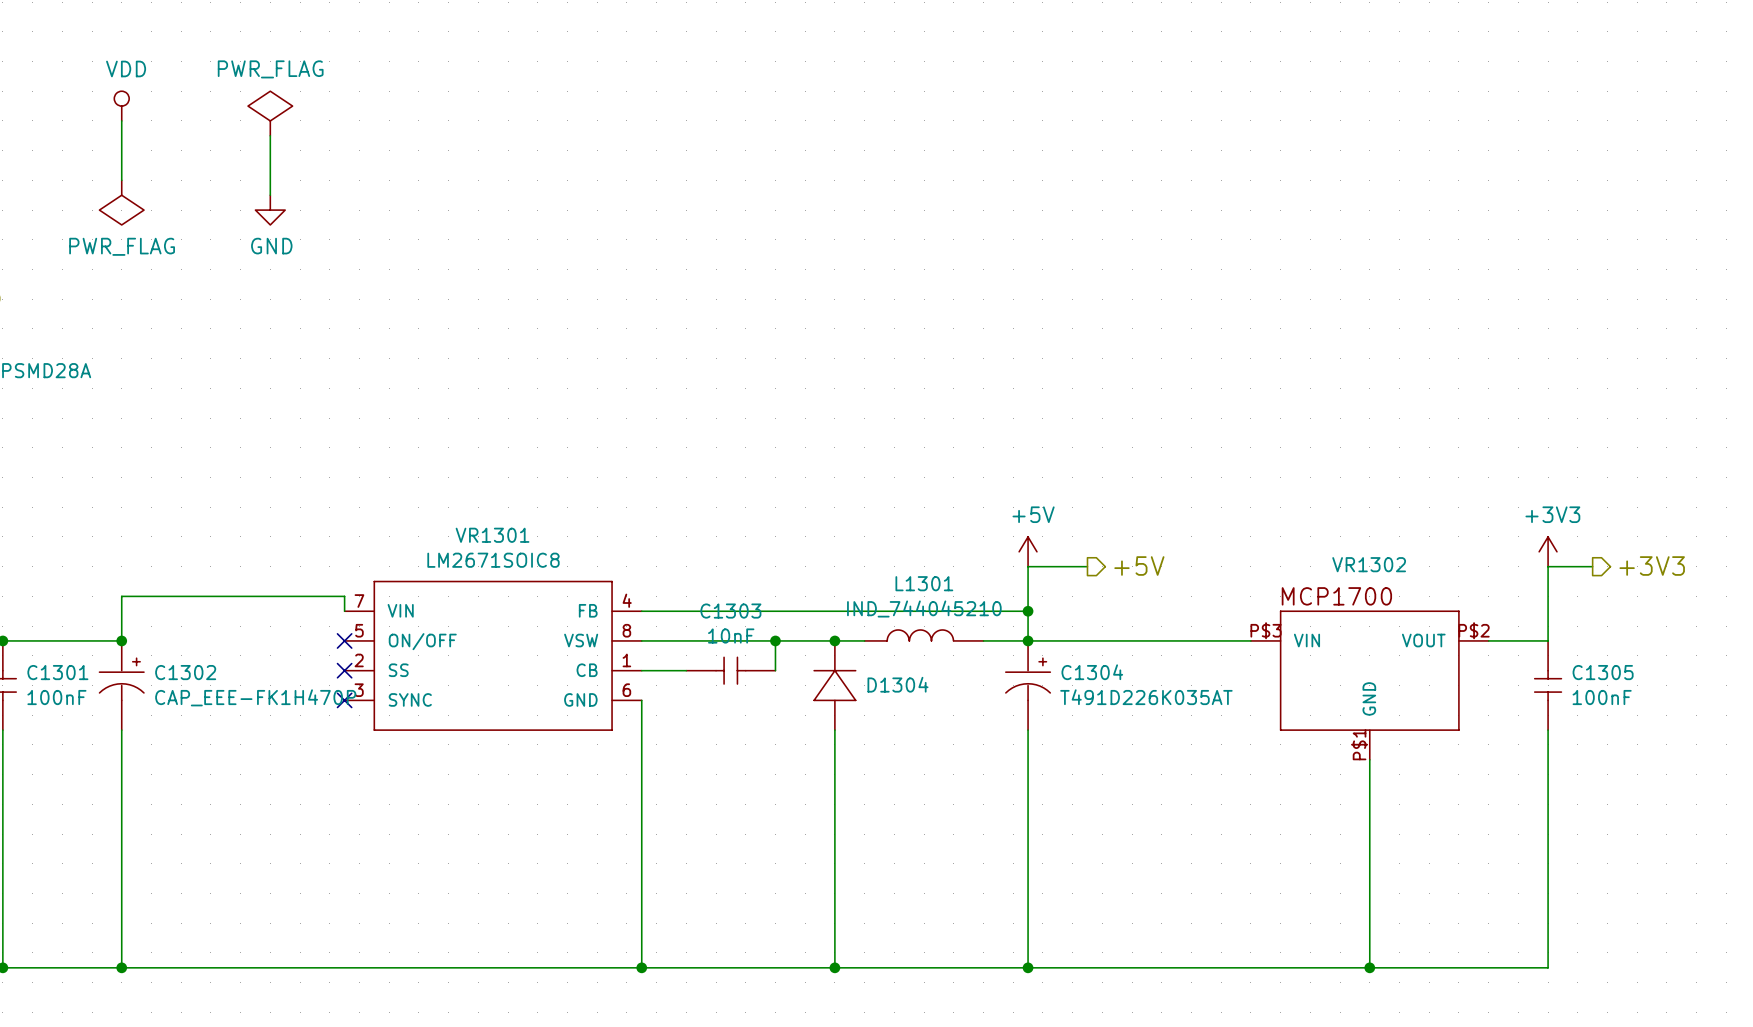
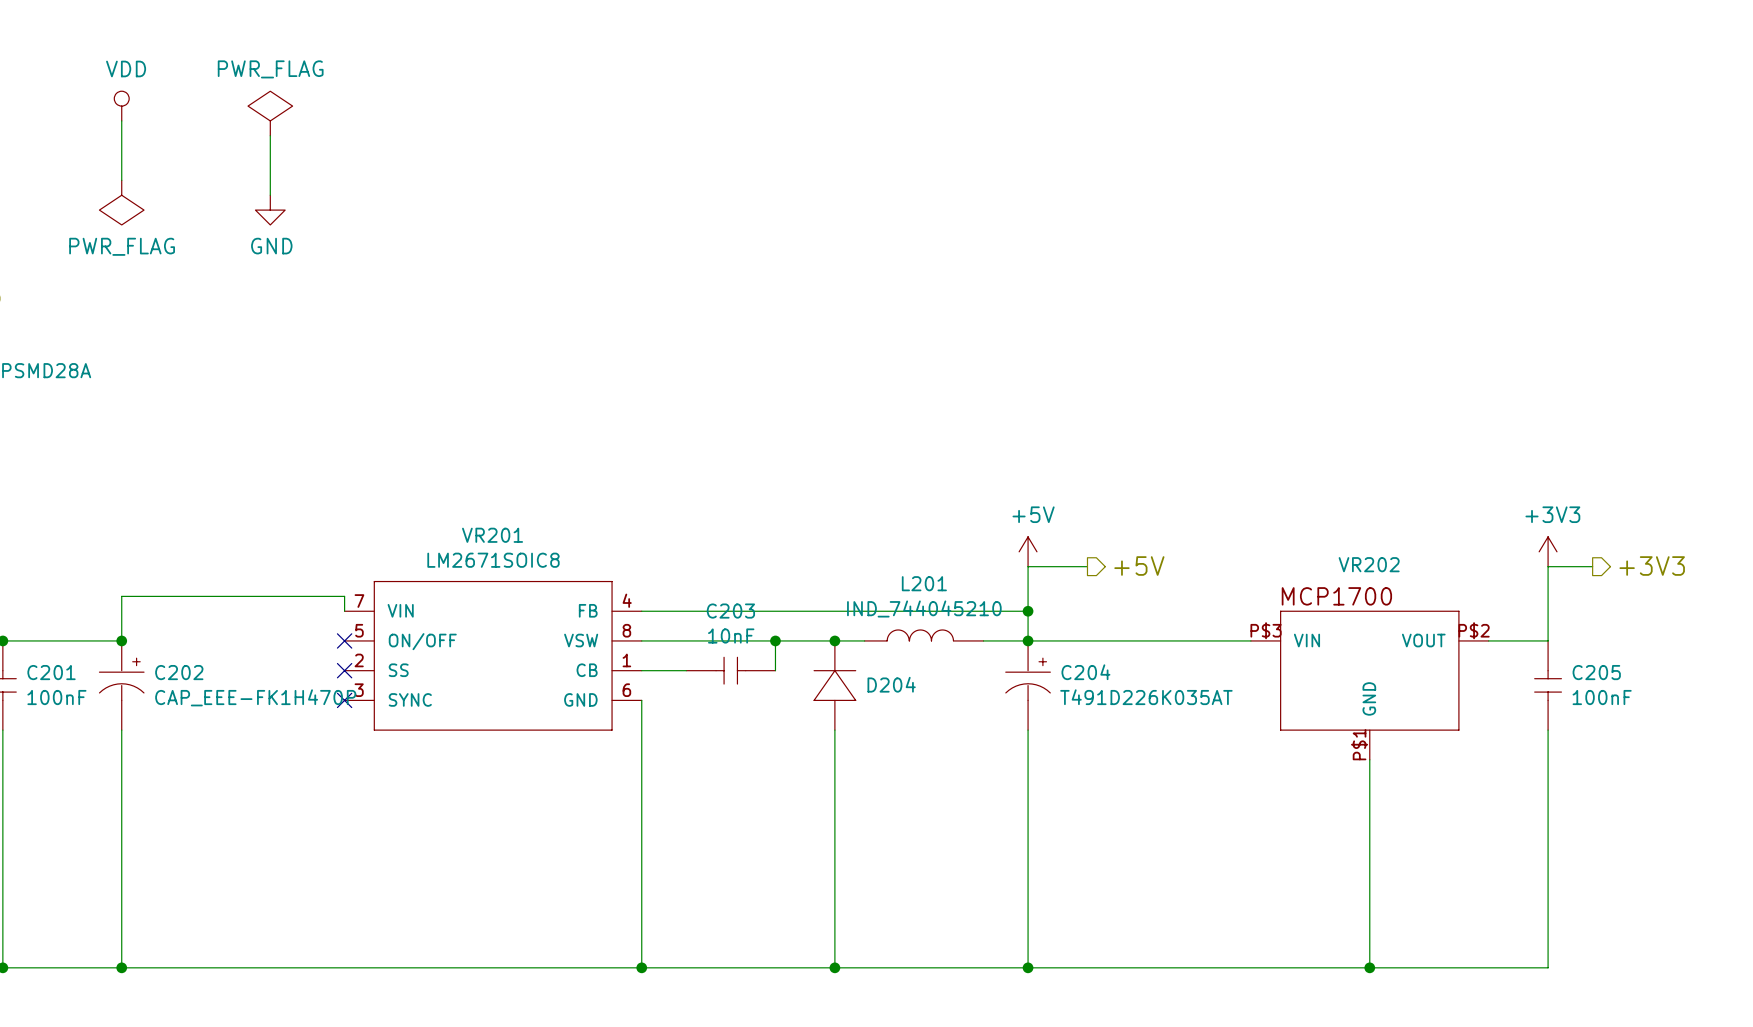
VR1301 name: VR1301 (492, 535) -> VR201 (492, 535)
VR1302 name: VR1302 (1369, 564) -> VR202 (1369, 564)
L1301 name: L1301 (924, 583) -> L201 (924, 583)
C1303 name: C1303 (730, 611) -> C203 (730, 611)
C1301 name: C1301 (57, 672) -> C201 (51, 672)
C1302 name: C1302 (185, 672) -> C202 (179, 672)
C1304 name: C1304 (1092, 672) -> C204 (1085, 672)
C1305 name: C1305 (1603, 672) -> C205 (1596, 672)
D1304 name: D1304 (897, 684) -> D204 (891, 684)

